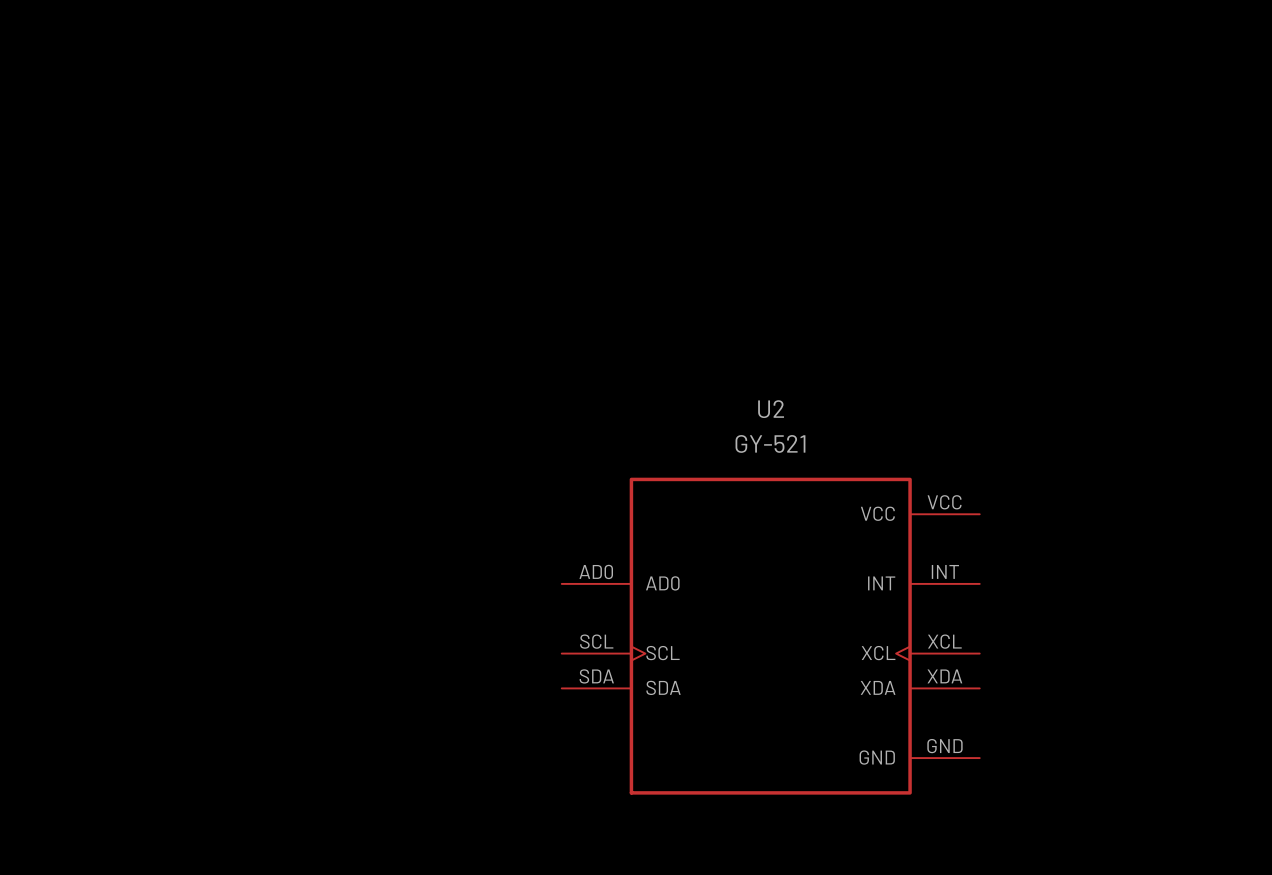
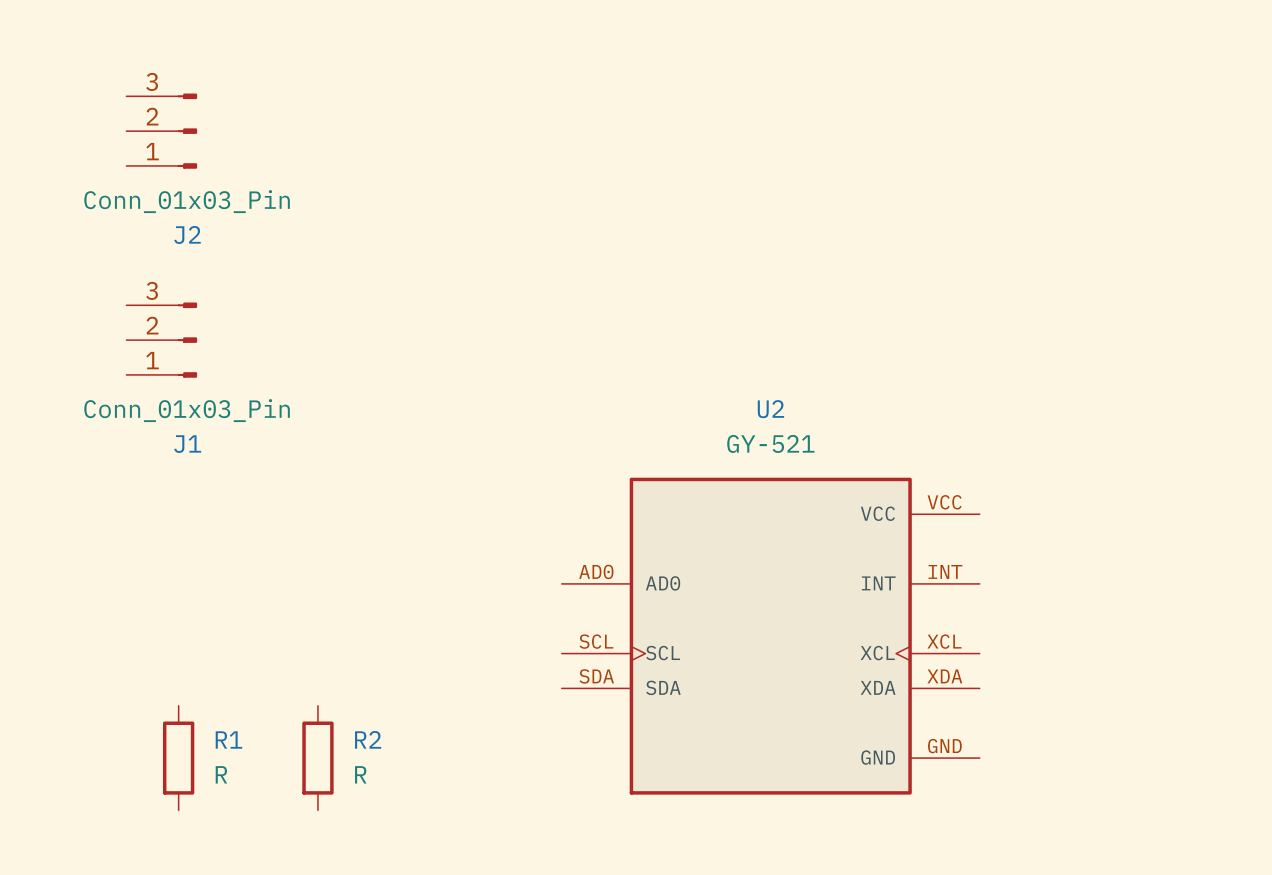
J2: none -> Conn_01x03_Pin (161, 131)
J1: none -> Conn_01x03_Pin (161, 340)
R1: none -> R (178, 758)
R2: none -> R (317, 758)

